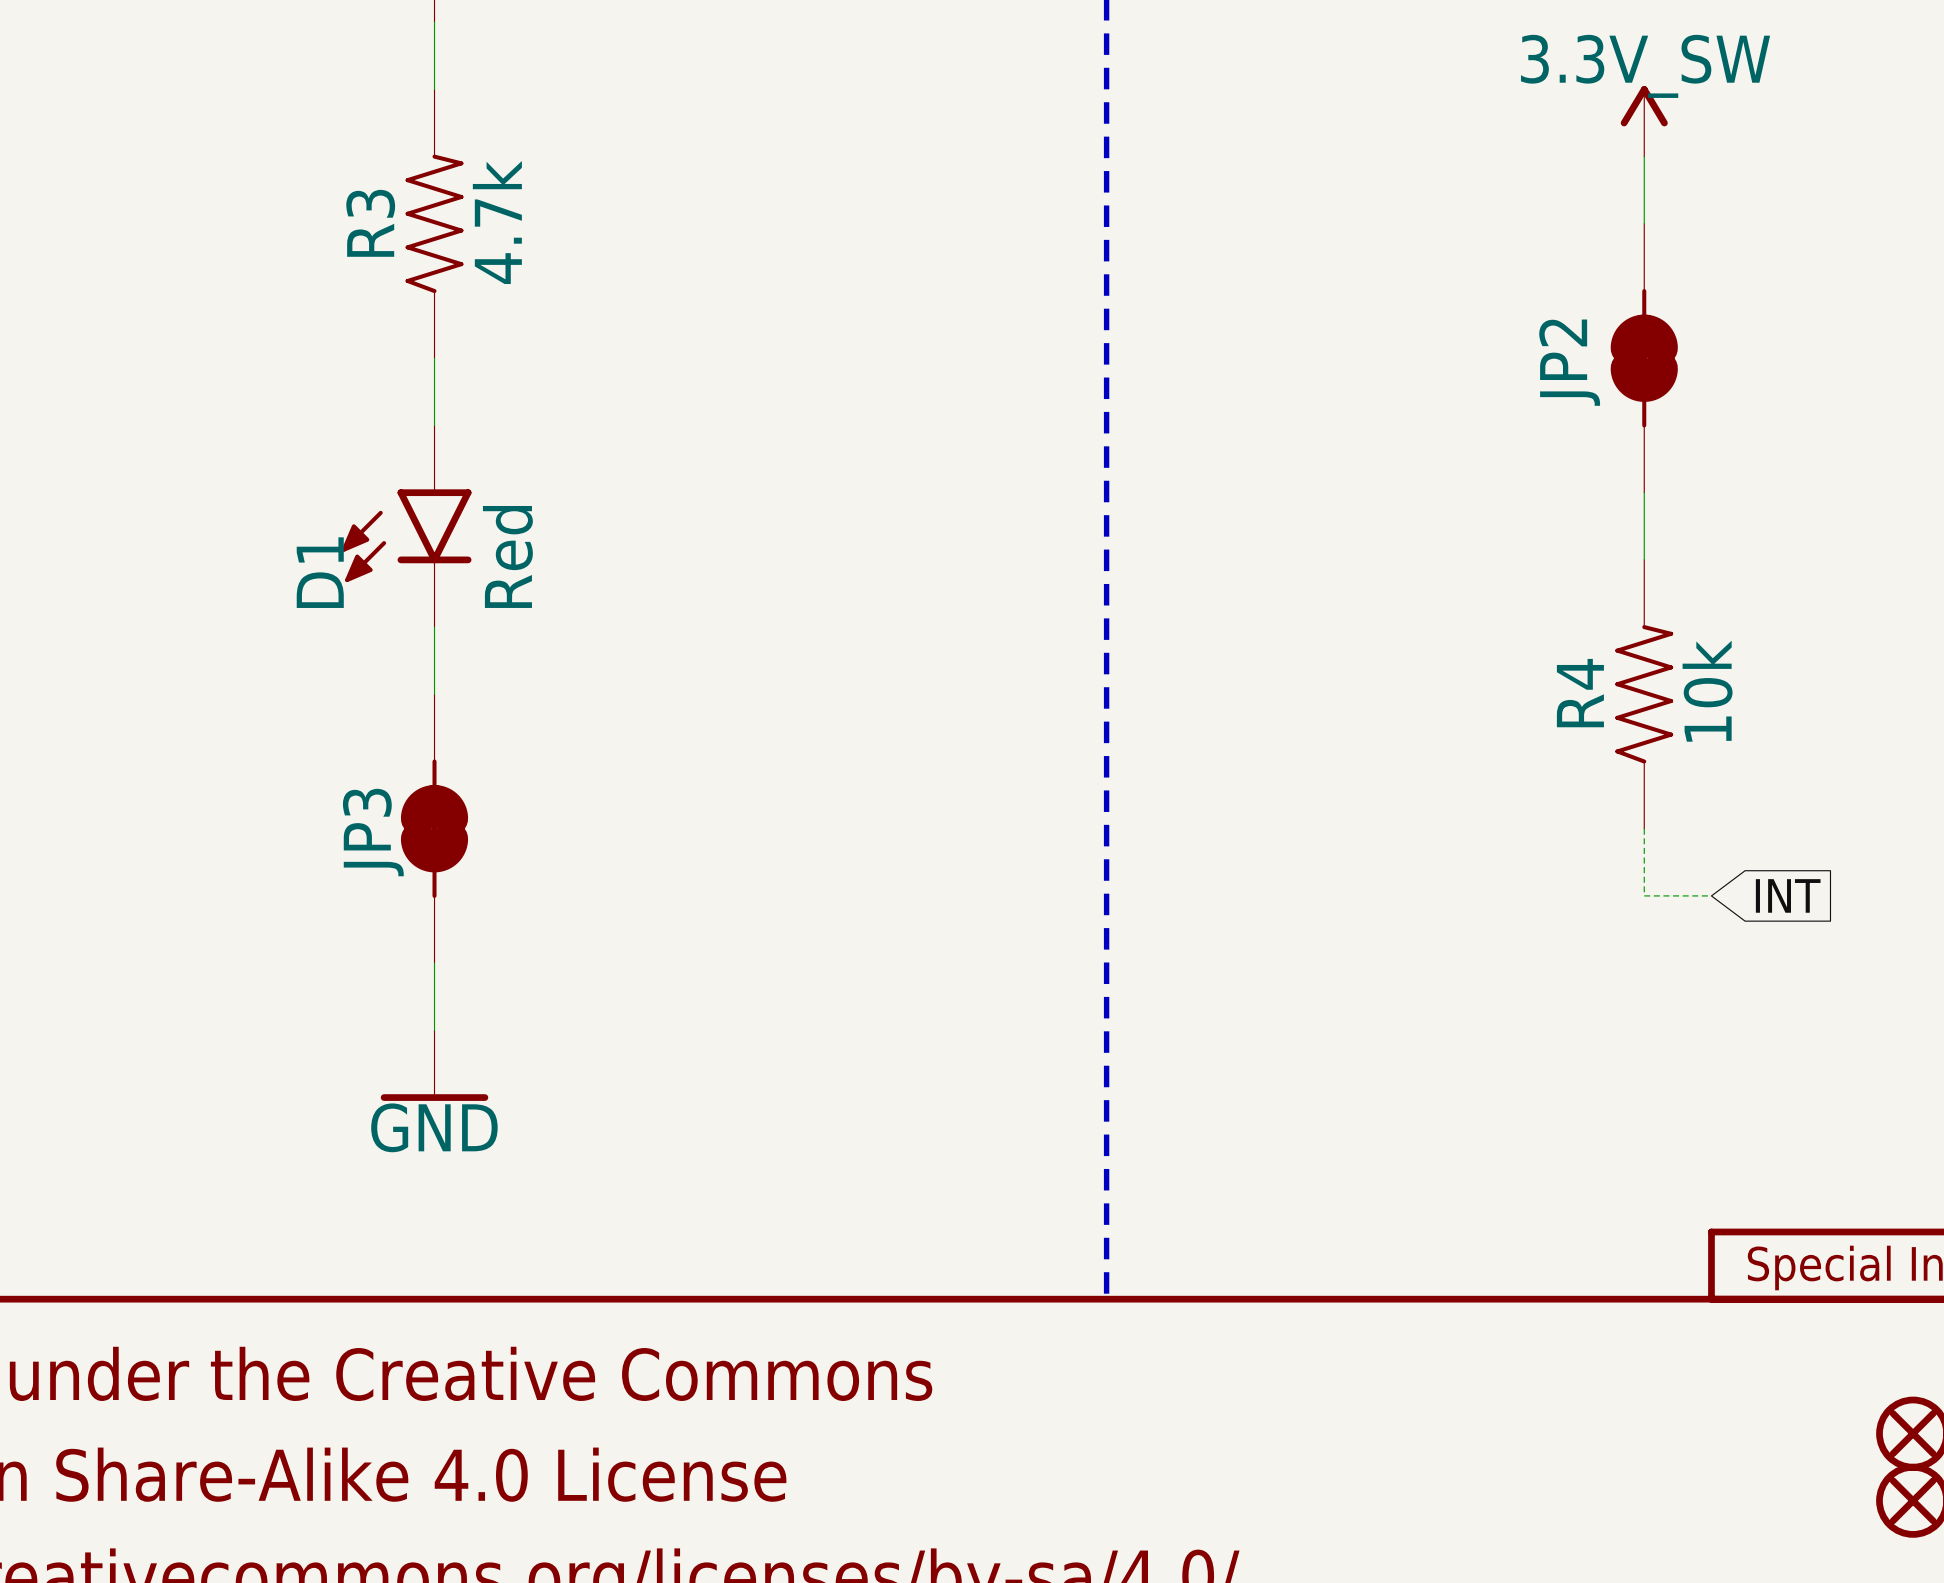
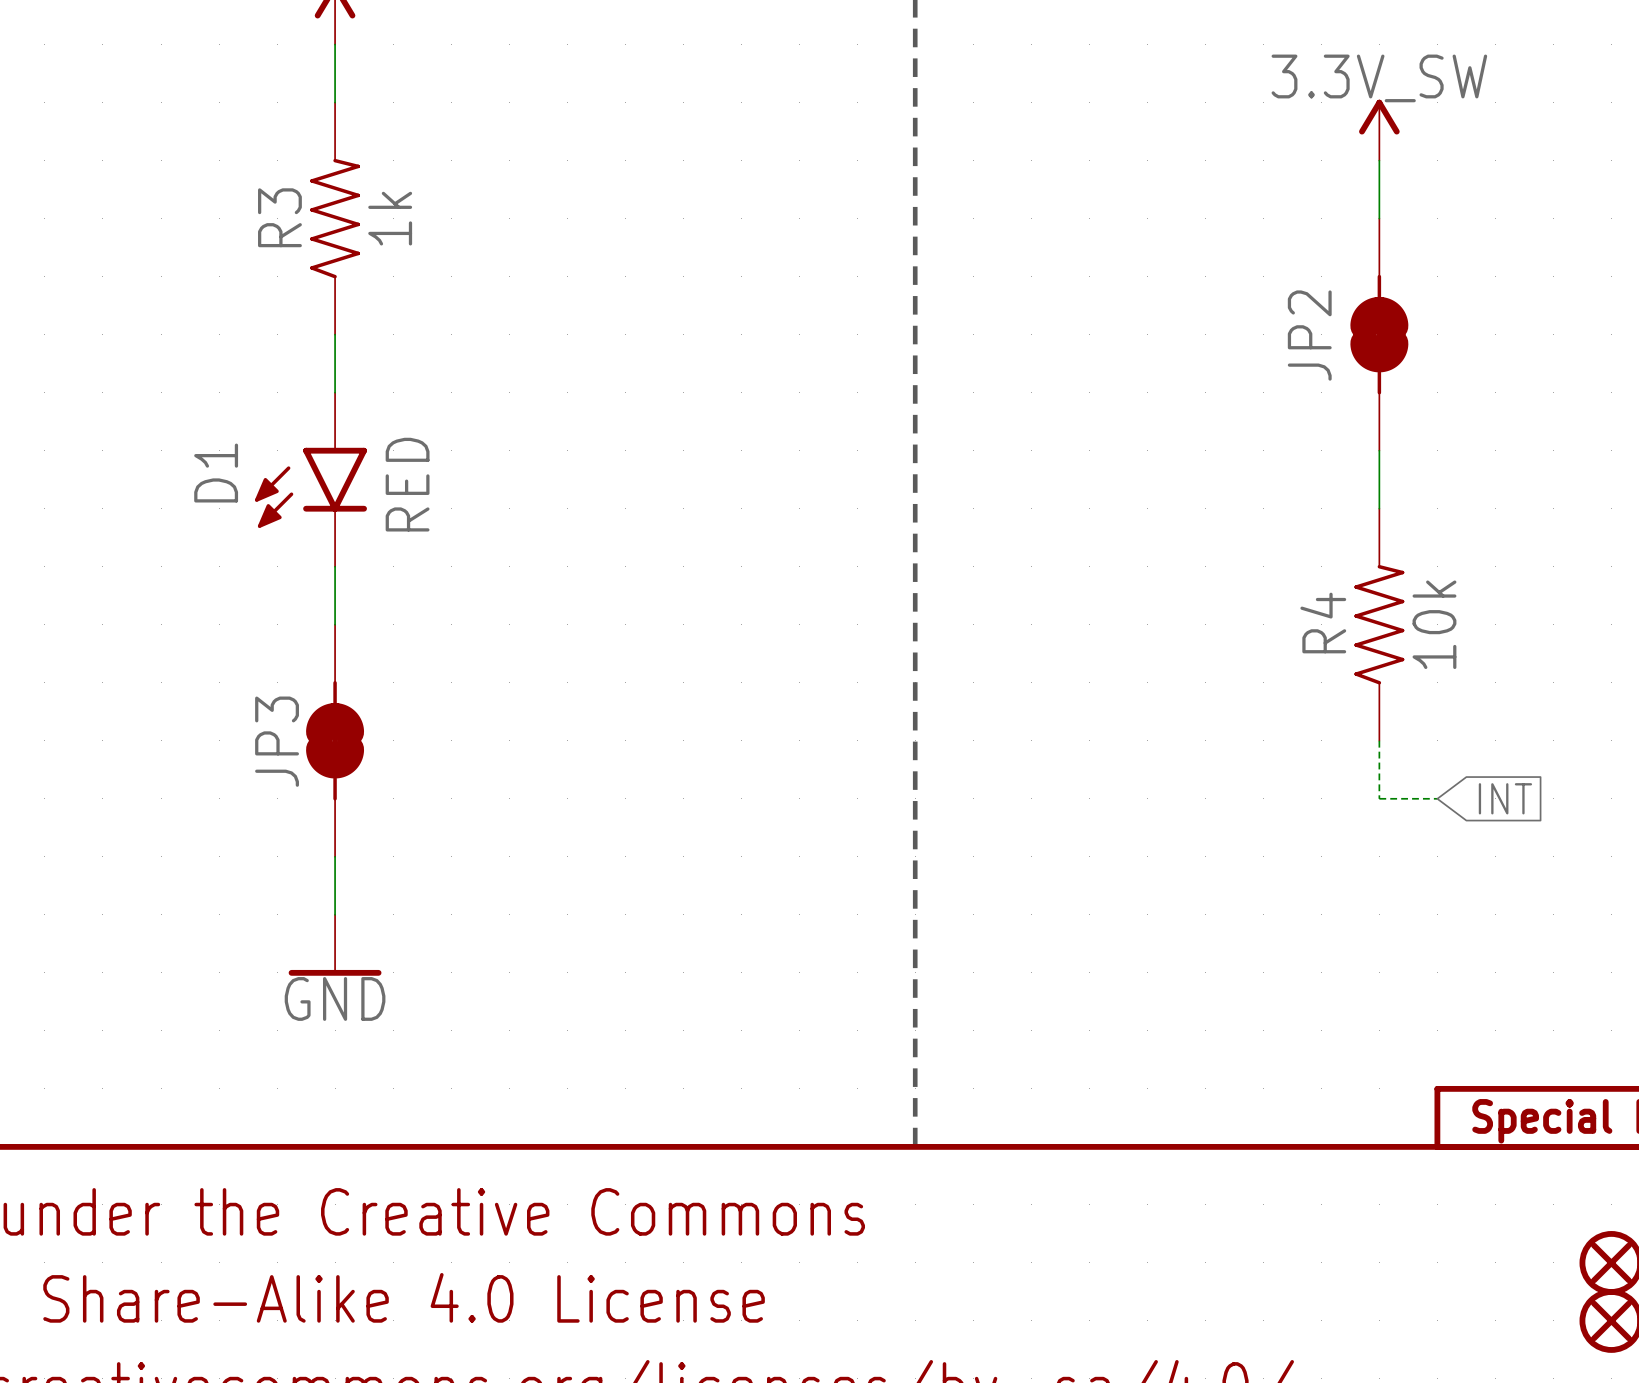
R3 value: 4.7k (497, 222) -> 1k (390, 218)
D1 value: Red (507, 556) -> RED (407, 484)
D1 name position: D1 (320, 572) -> D1 (216, 473)

